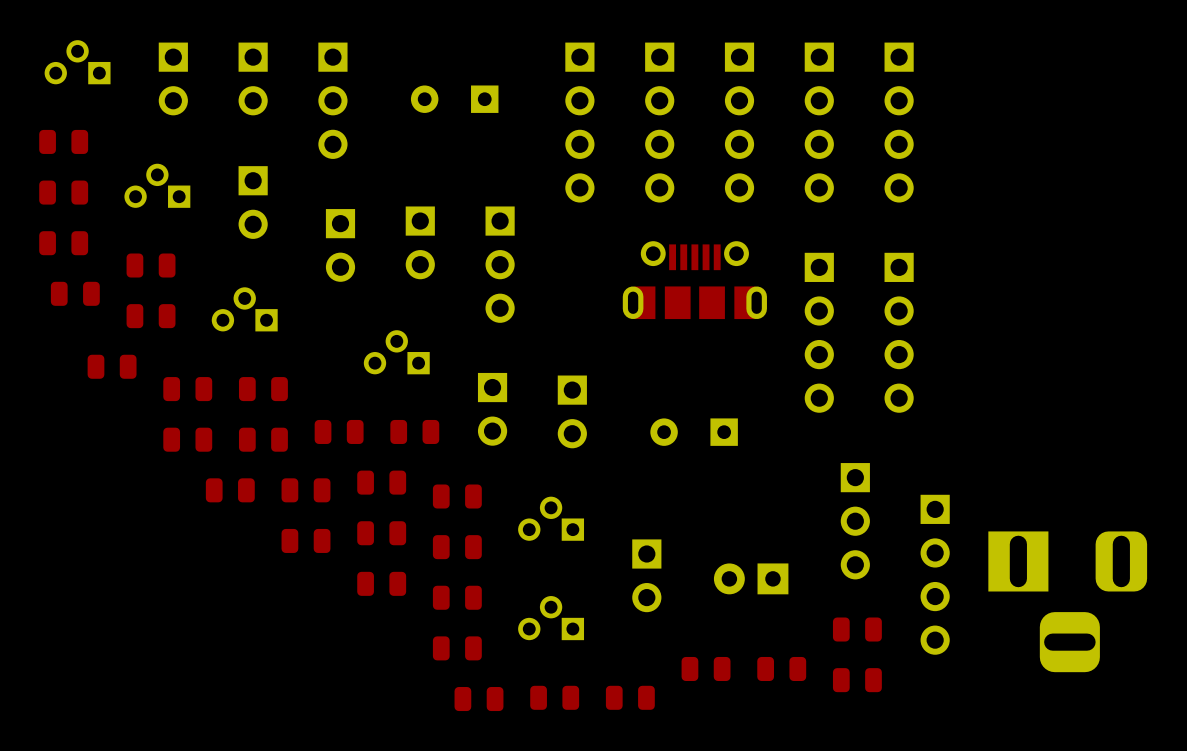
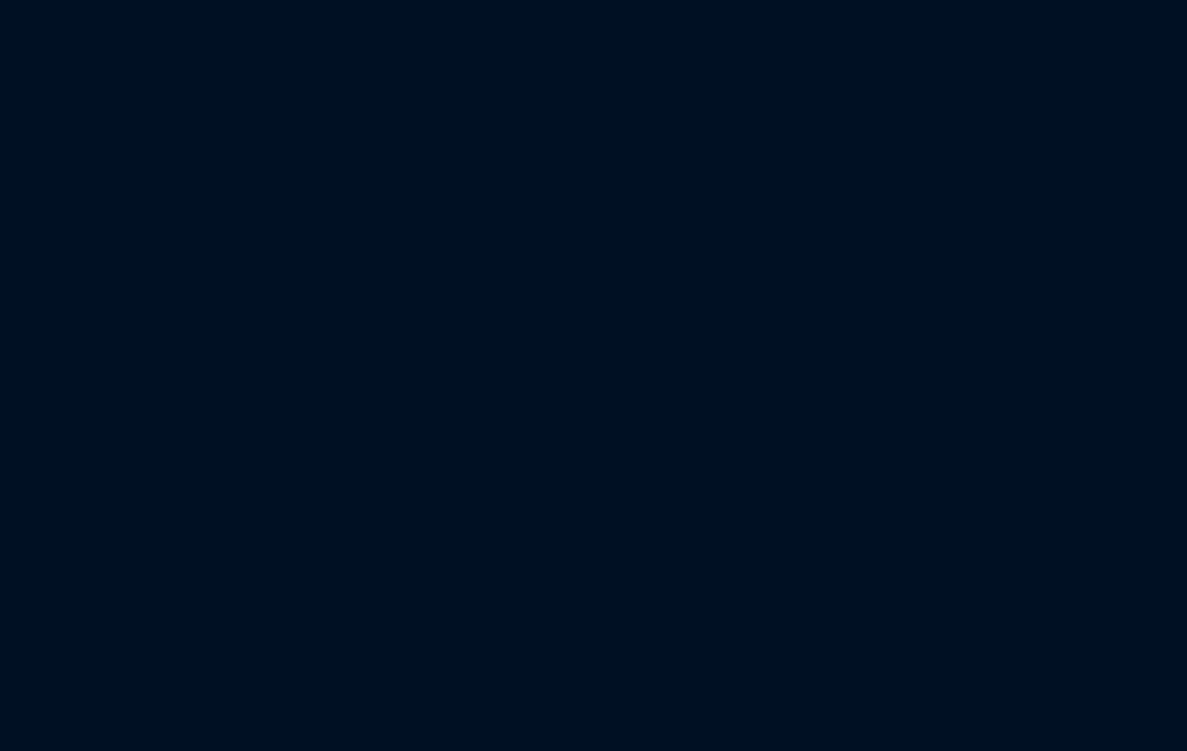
part: (77, 62) -> none
part: (173, 78) -> none
part: (253, 78) -> none
part: (454, 99) -> none
part: (332, 100) -> none
part: (579, 122) -> none
part: (659, 122) -> none
part: (739, 122) -> none
part: (819, 122) -> none
part: (899, 122) -> none
part: (63, 141) -> none
part: (157, 185) -> none
part: (63, 192) -> none
part: (253, 202) -> none
part: (420, 242) -> none
part: (63, 243) -> none
part: (340, 245) -> none
part: (500, 264) -> none
part: (151, 265) -> none
part: (694, 280) -> none
part: (75, 293) -> none
part: (244, 309) -> none
part: (151, 316) -> none
part: (819, 332) -> none
part: (899, 332) -> none
part: (396, 352) -> none
part: (112, 366) -> none
part: (187, 389) -> none
part: (263, 389) -> none
part: (492, 409) -> none
part: (572, 411) -> none
part: (339, 431) -> none
part: (414, 431) -> none
part: (694, 432) -> none
part: (187, 439) -> none
part: (263, 439) -> none
part: (381, 482) -> none
part: (230, 490) -> none
part: (306, 490) -> none
part: (457, 496) -> none
part: (551, 518) -> none
part: (855, 521) -> none
part: (381, 533) -> none
part: (306, 540) -> none
part: (457, 547) -> none
part: (935, 574) -> none
part: (646, 575) -> none
part: (751, 578) -> none
part: (381, 583) -> none
part: (457, 597) -> none
part: (1067, 601) -> none
part: (551, 618) -> none
part: (857, 629) -> none
part: (457, 648) -> none
part: (706, 668) -> none
part: (781, 668) -> none
part: (857, 680) -> none
part: (554, 697) -> none
part: (630, 697) -> none
part: (478, 699) -> none

